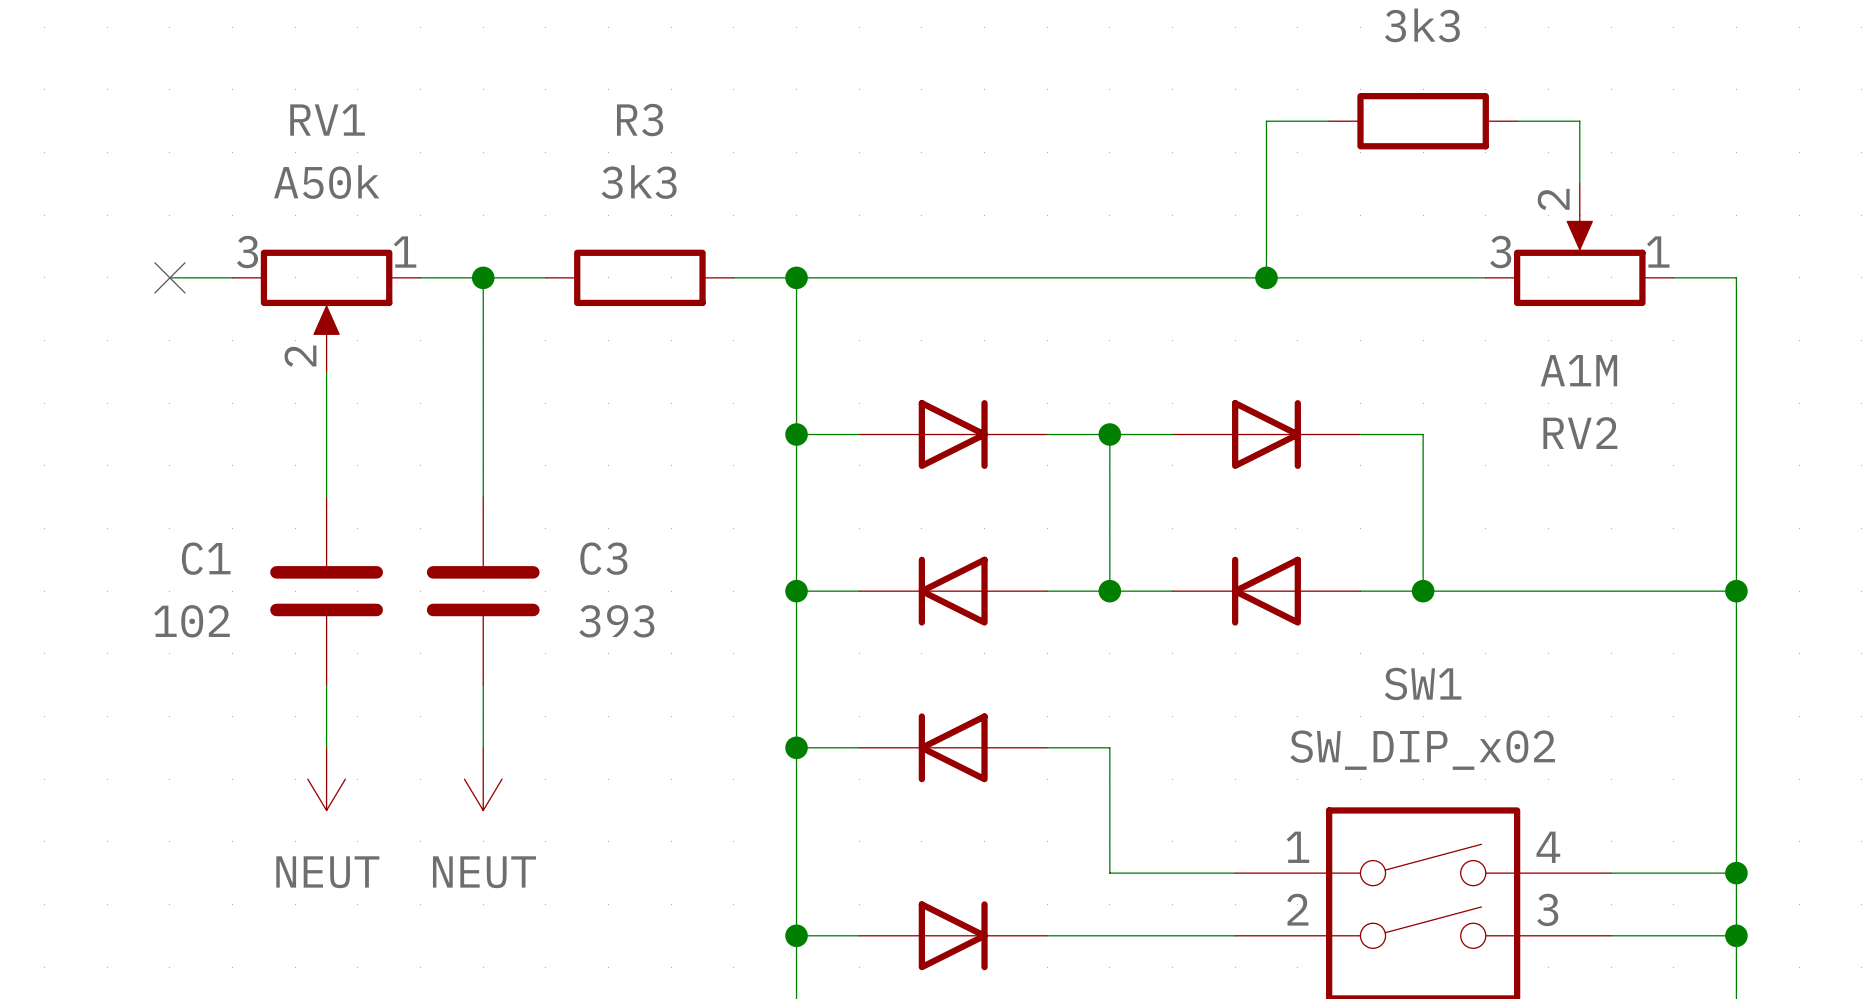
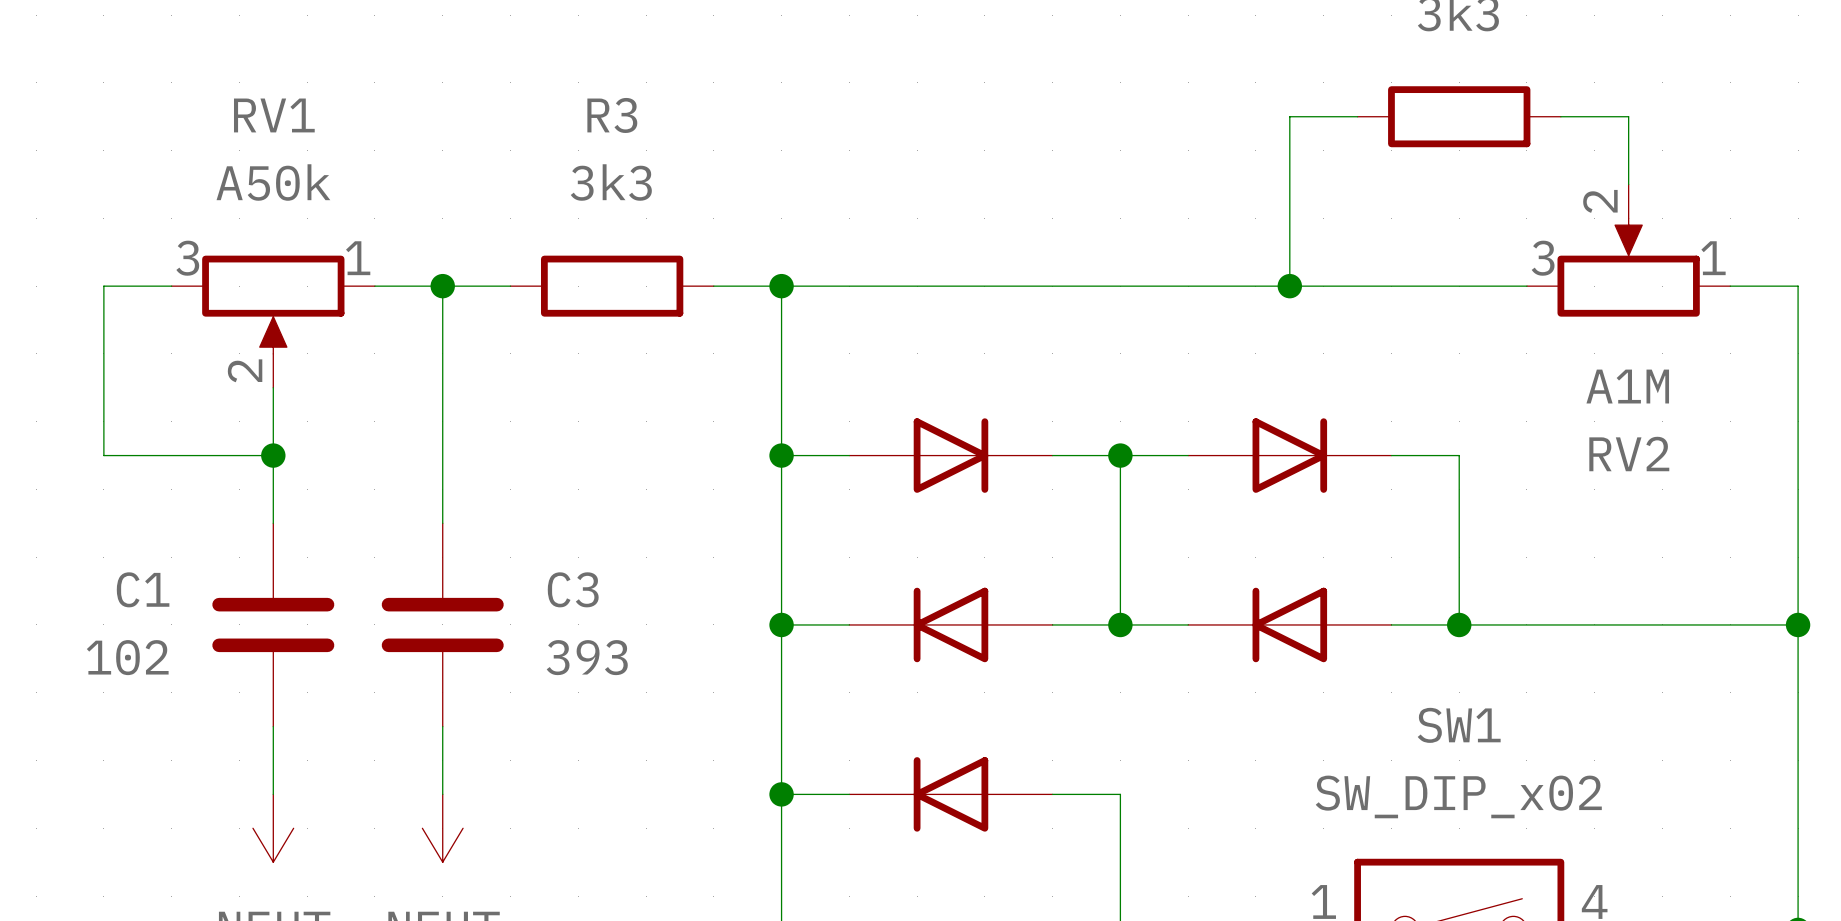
wire: none -> (103, 286) (103, 455) (273, 455)
no-connect mark: (169, 277) -> none
junction: none -> (273, 455)

